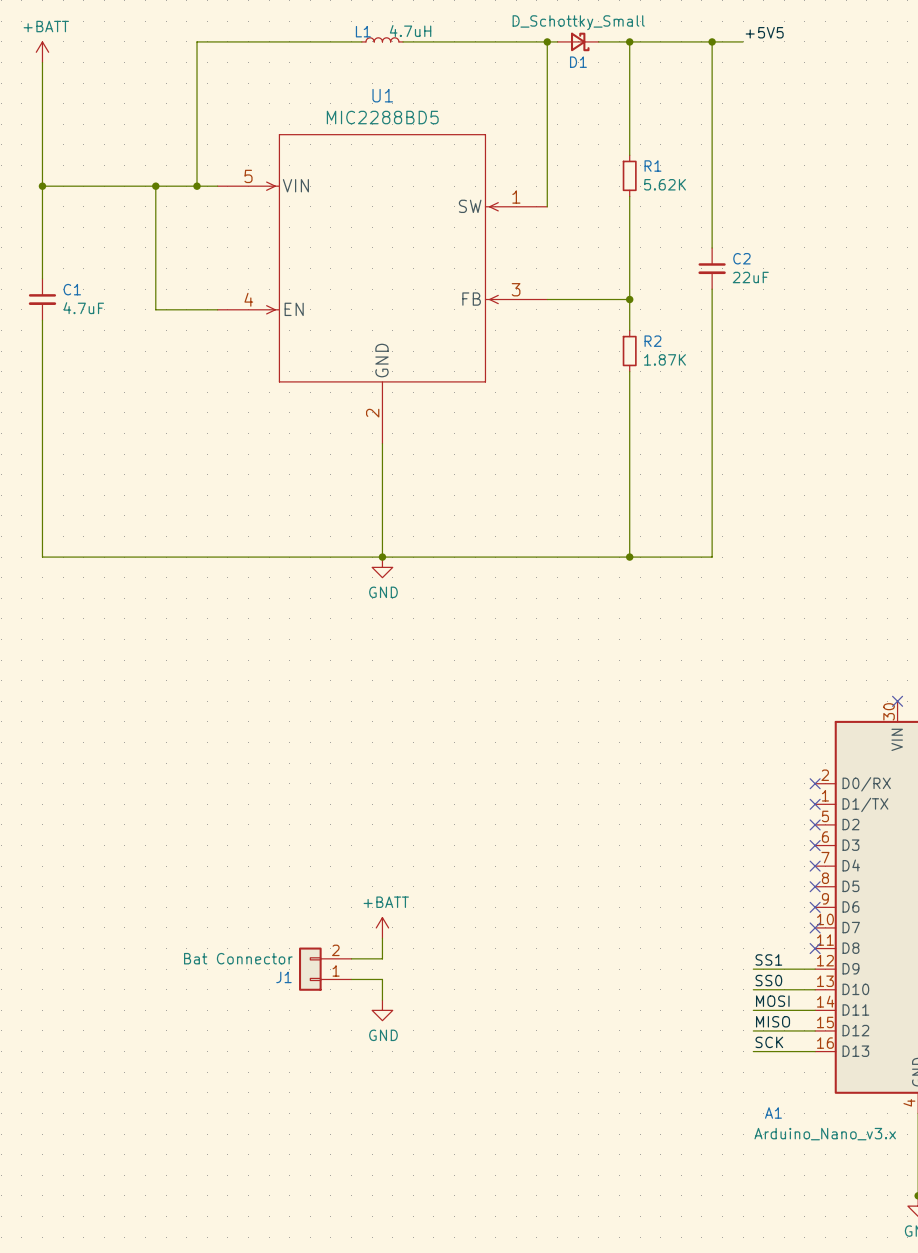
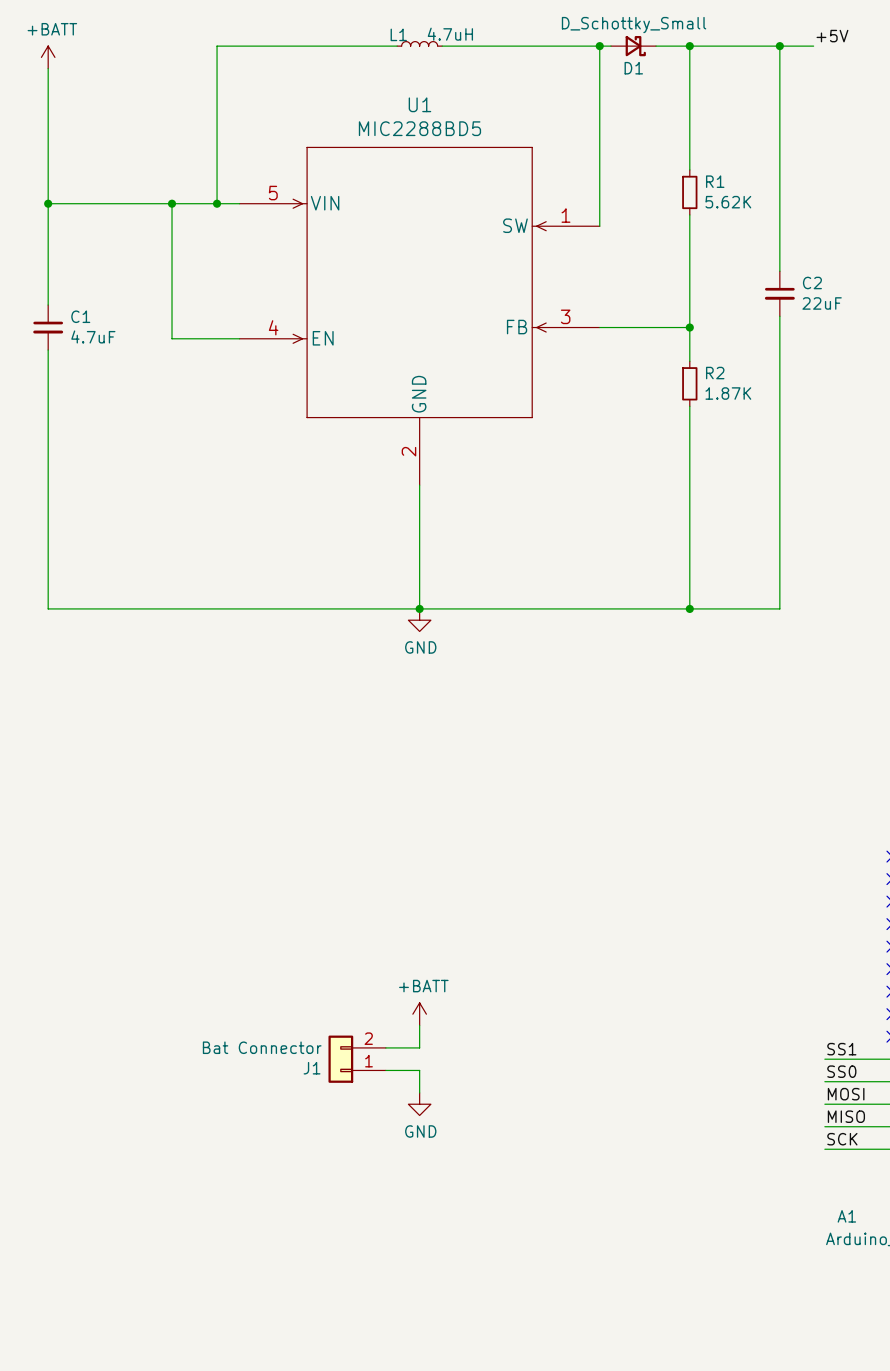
label: +5V5 (764, 32) -> +5V (832, 36)

